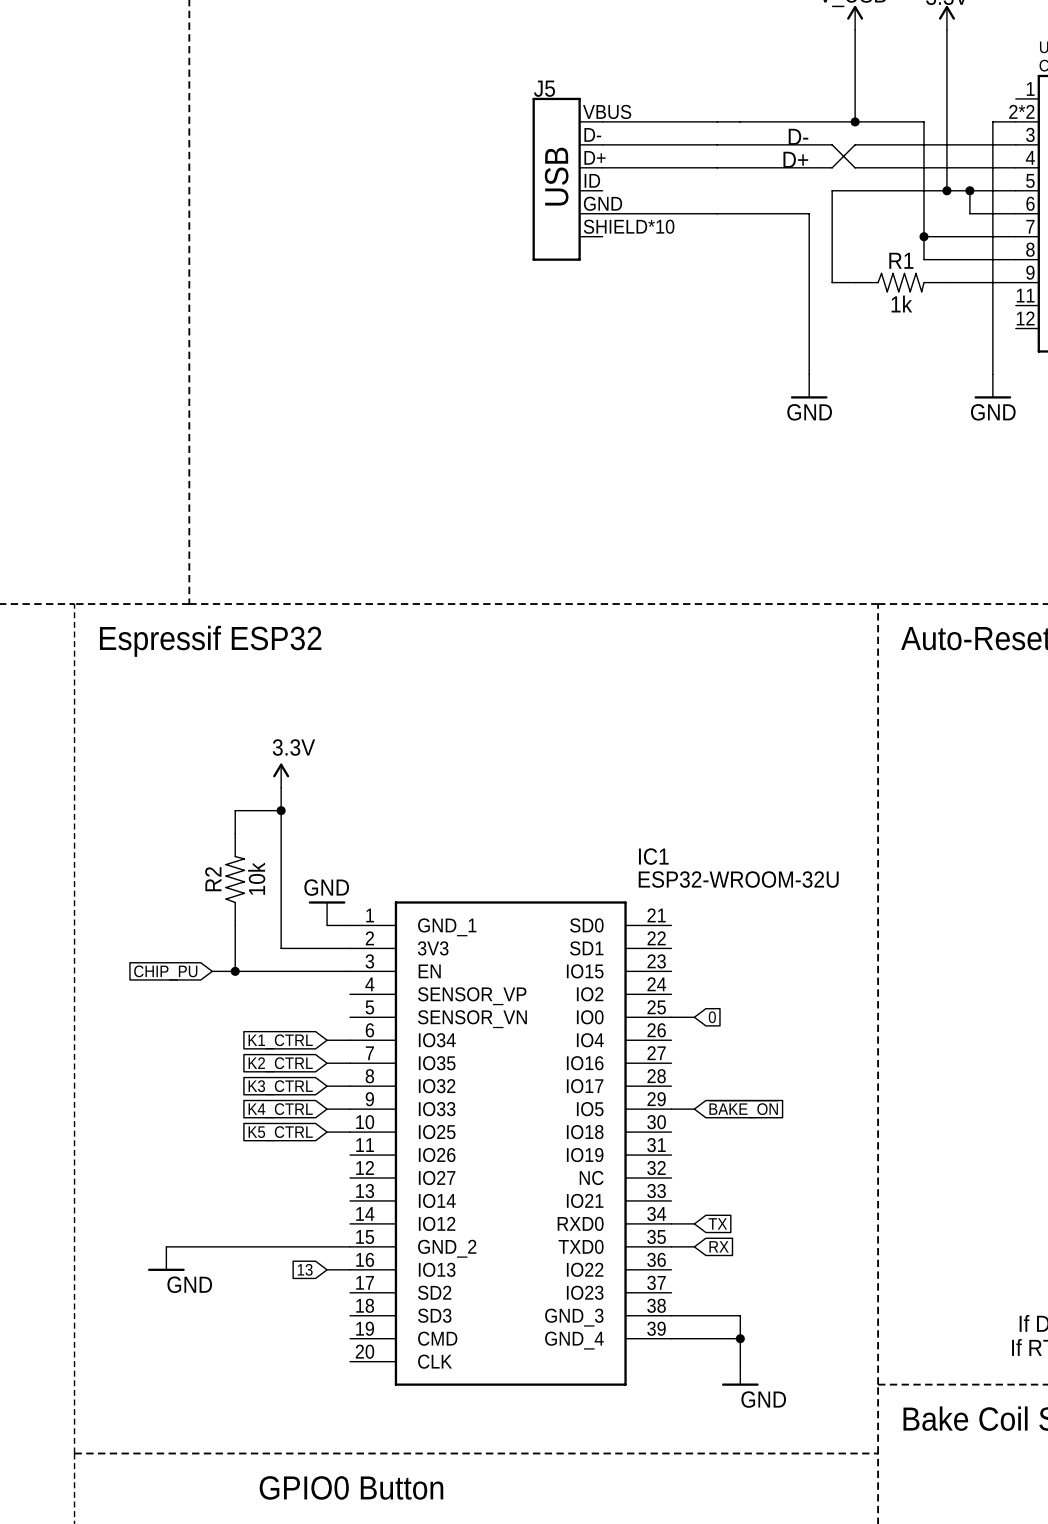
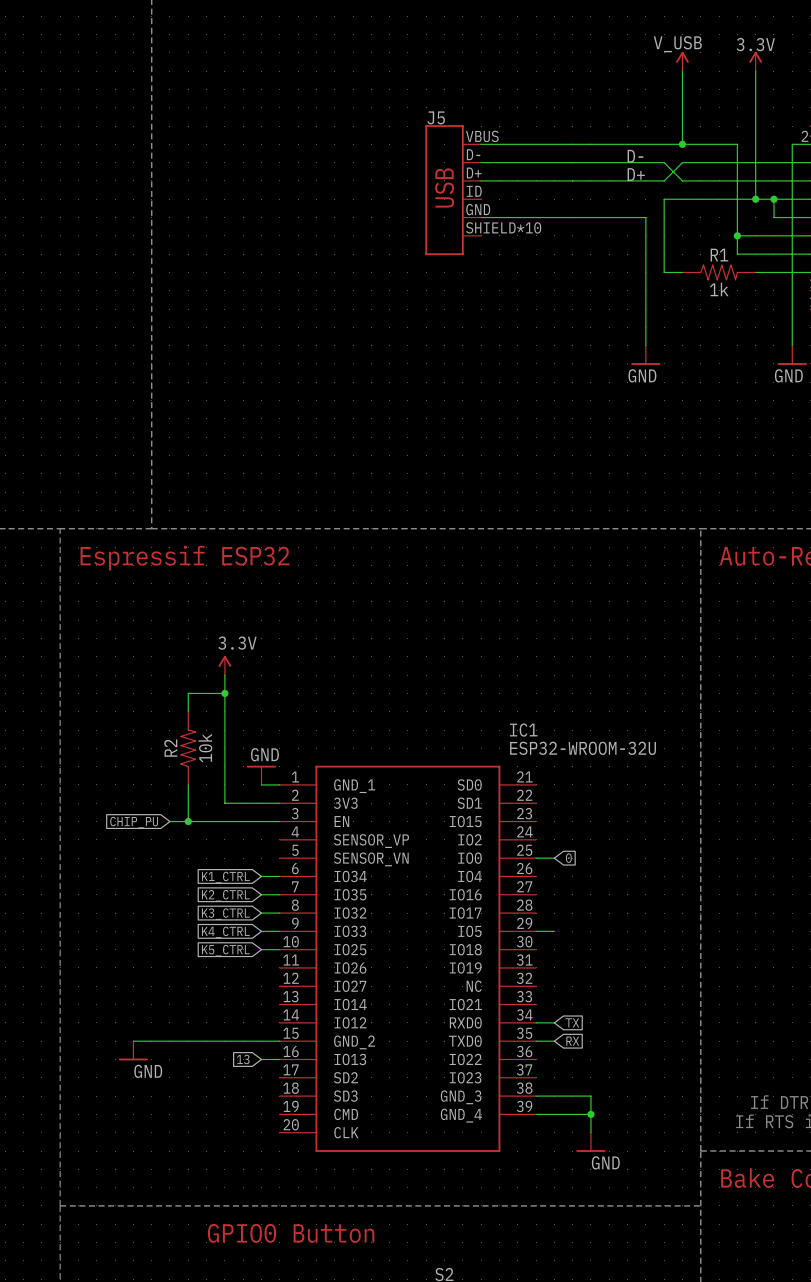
global label: ~{BAKE_ON} (743, 1109) -> none

